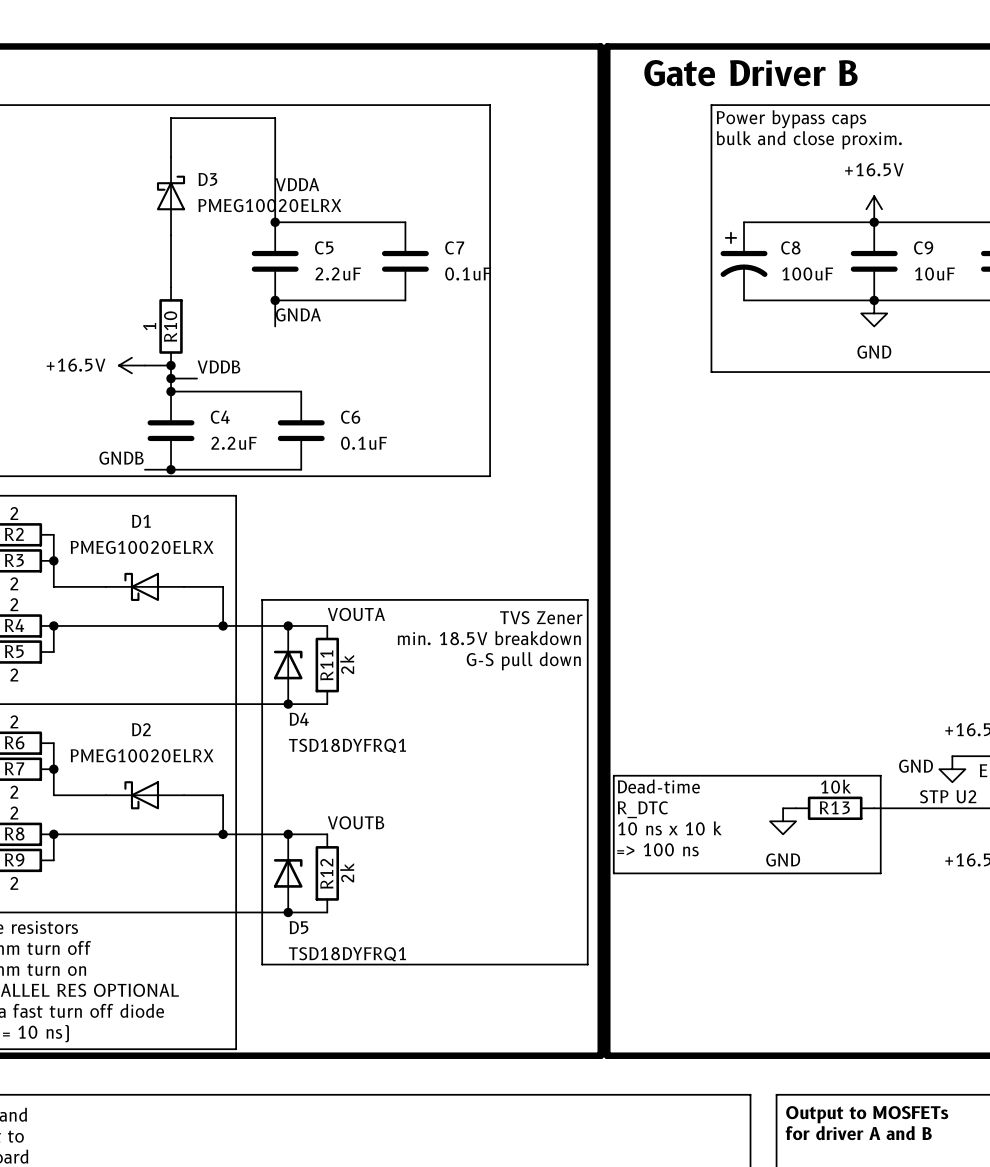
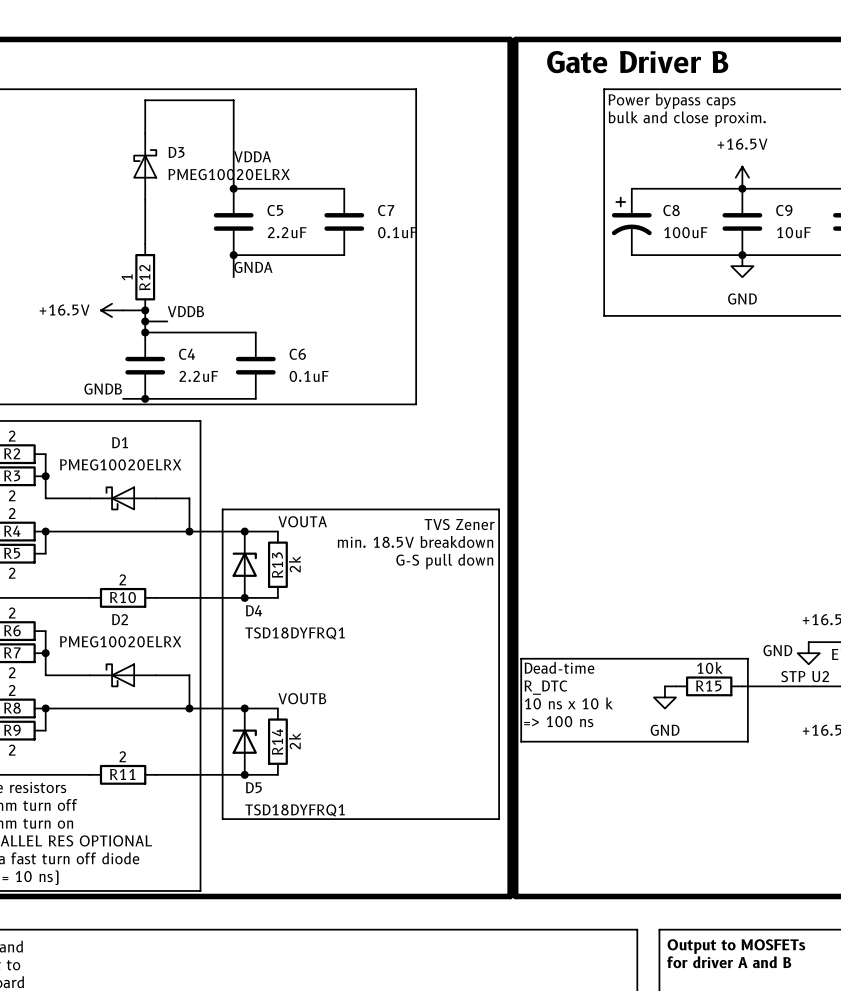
R10 name: R10 (170, 326) -> R12 (144, 277)
R11 name: R11 (326, 665) -> R13 (277, 565)
wire: (105, 704) (184, 704) -> none
R10: none -> 2 (123, 597)
R13 name: R13 (834, 807) -> R15 (708, 685)
R12 name: R12 (326, 873) -> R14 (277, 741)
wire: (105, 912) (184, 912) -> none
R11: none -> 2 (123, 774)

